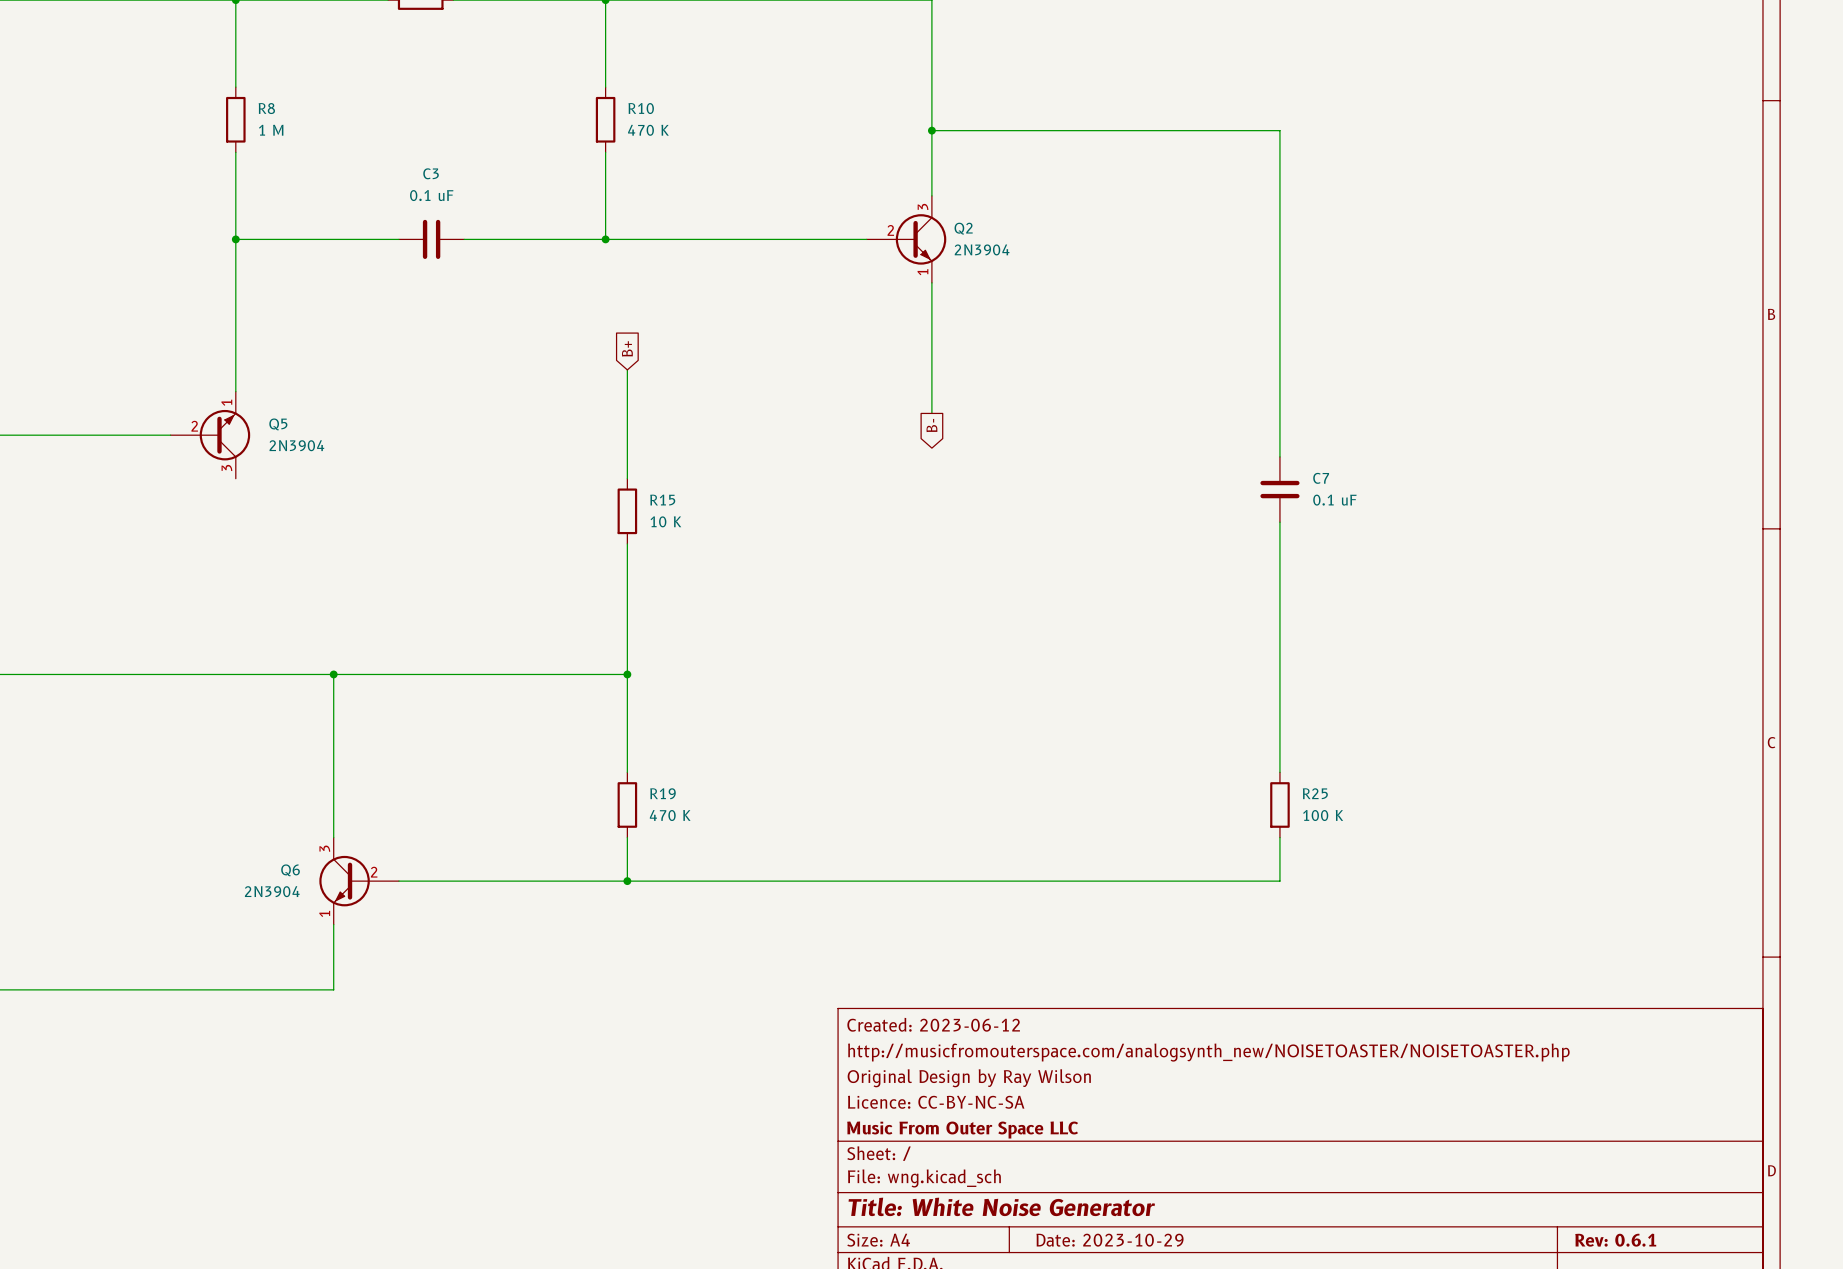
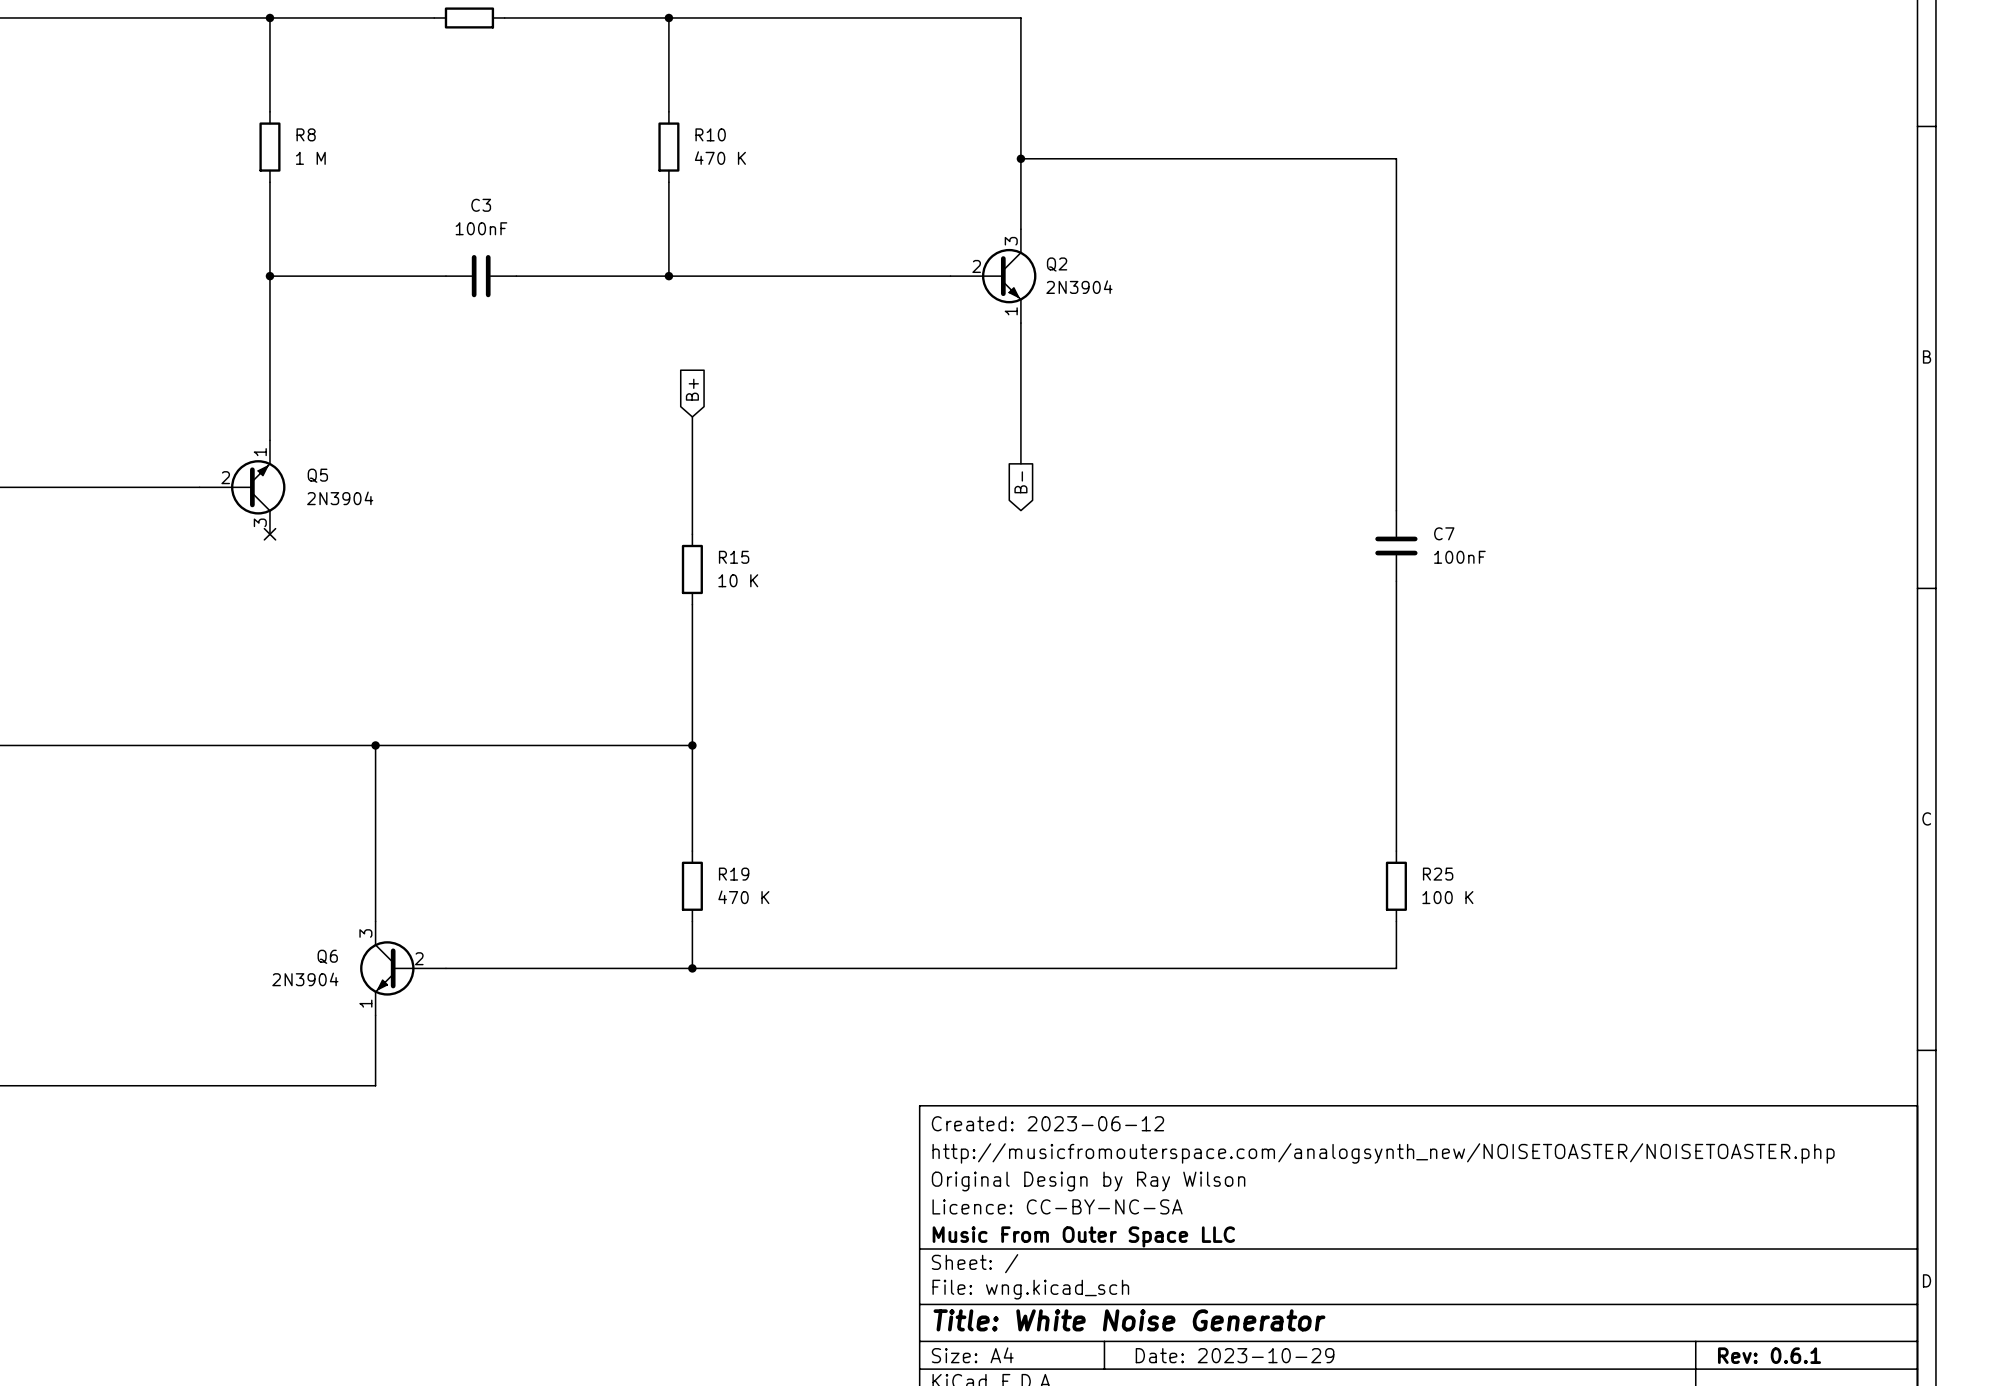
C3 value: 0.1 uF (431, 195) -> 100nF (481, 228)
no-connect mark: none -> (269, 534)
C7 value: 0.1 uF (1334, 500) -> 100nF (1459, 557)

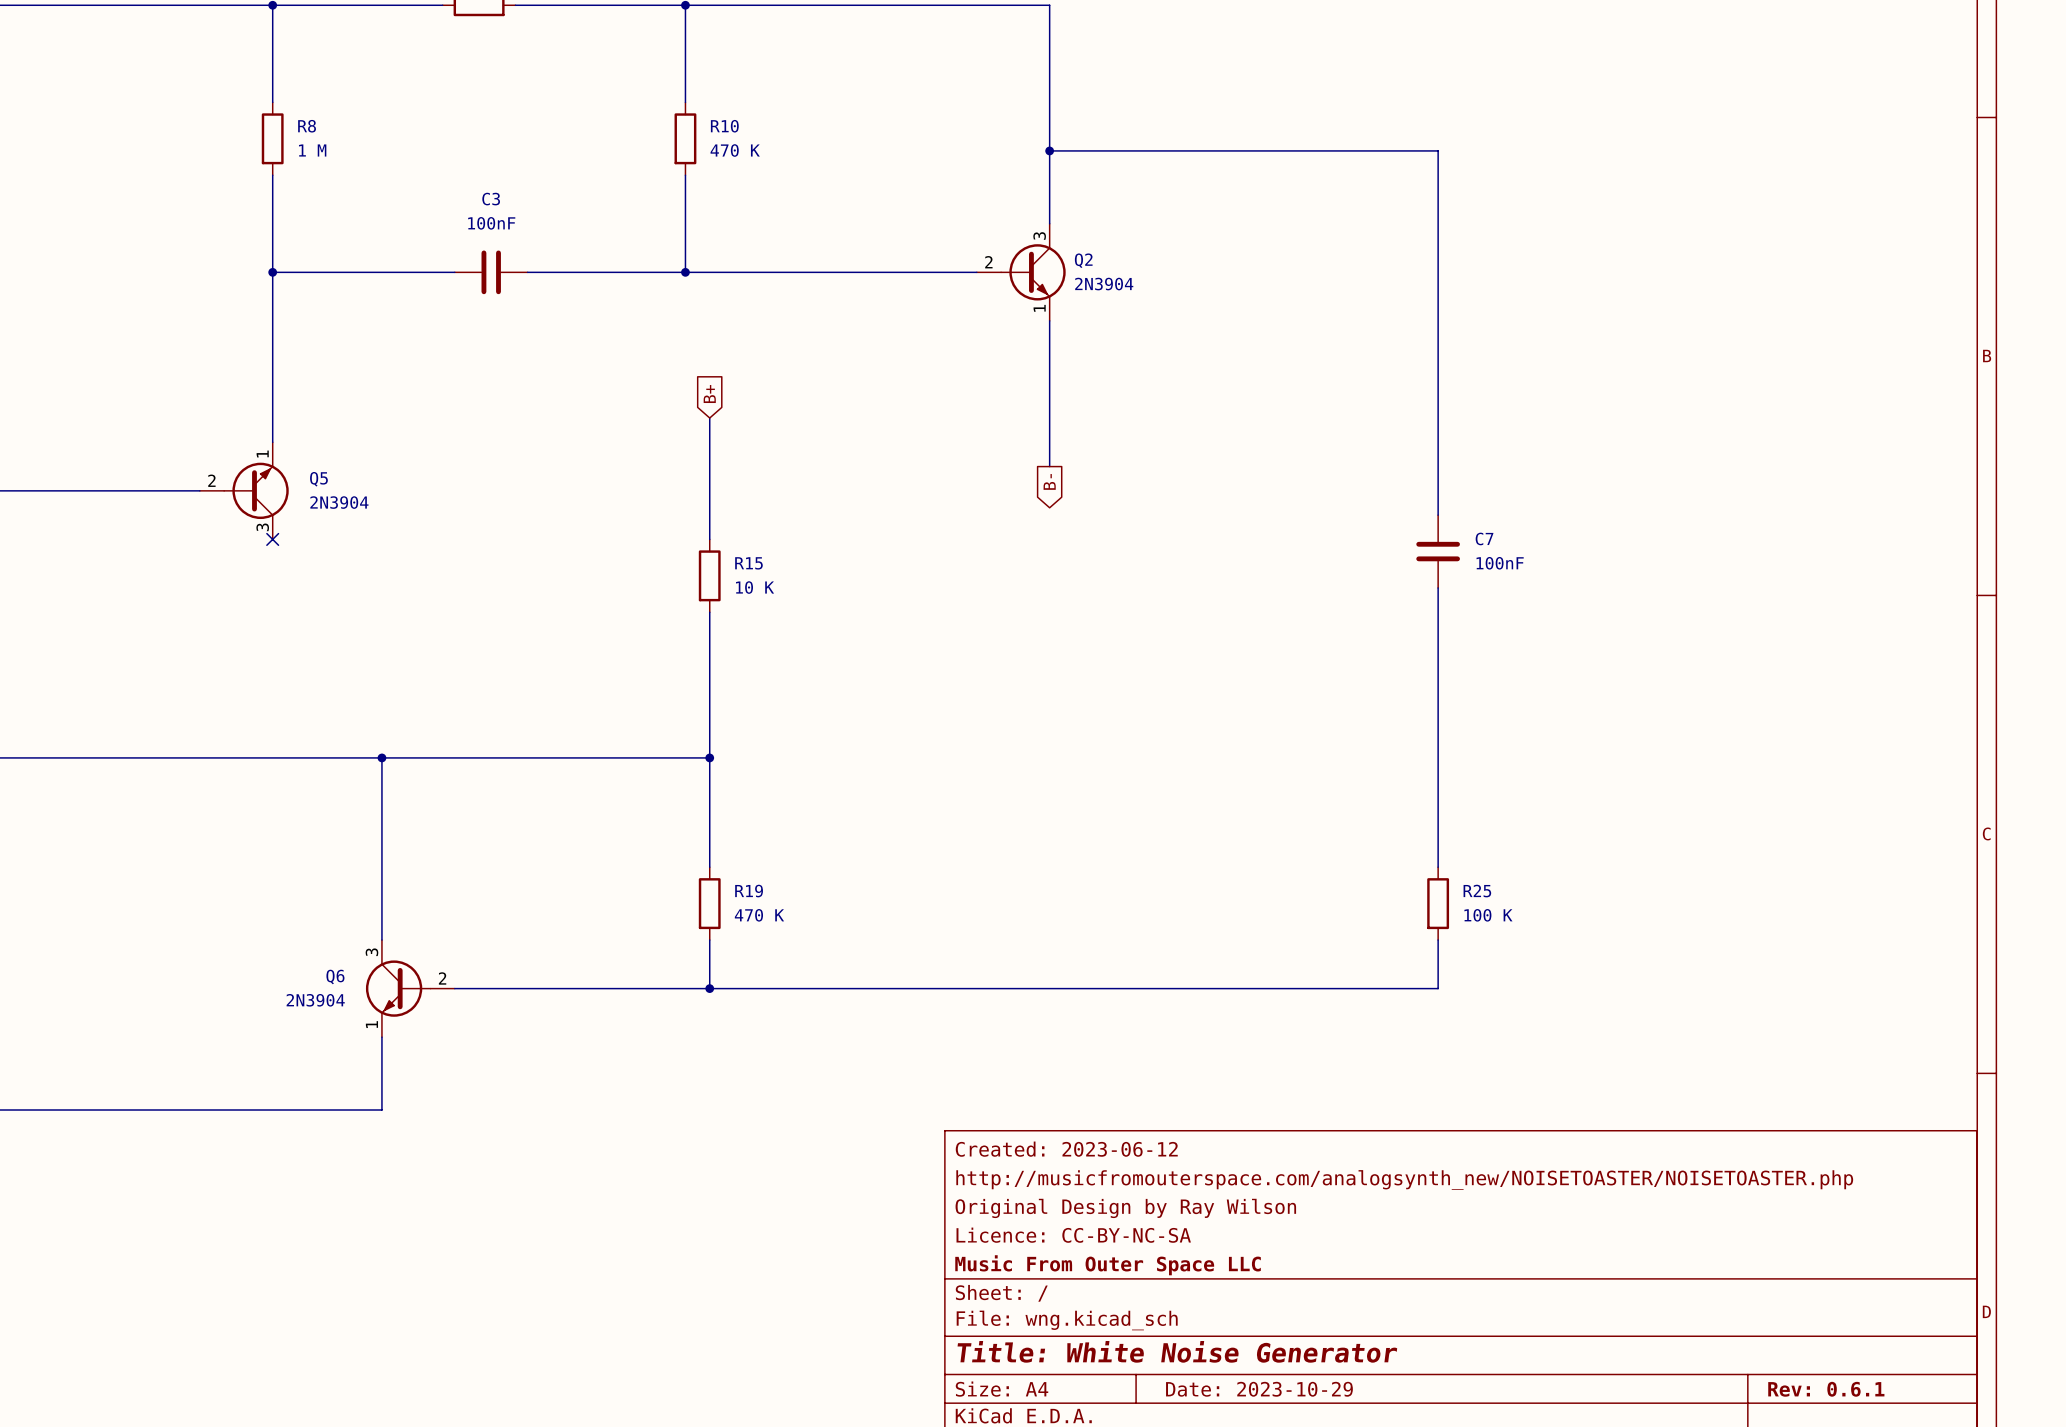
Q2 symbol: [950, 229, 1037, 324] -> [976, 223, 1066, 321]
Q5 symbol: [199, 440, 286, 535] -> [199, 442, 289, 540]
Q6 symbol: [360, 921, 446, 1016] -> [365, 940, 455, 1038]

